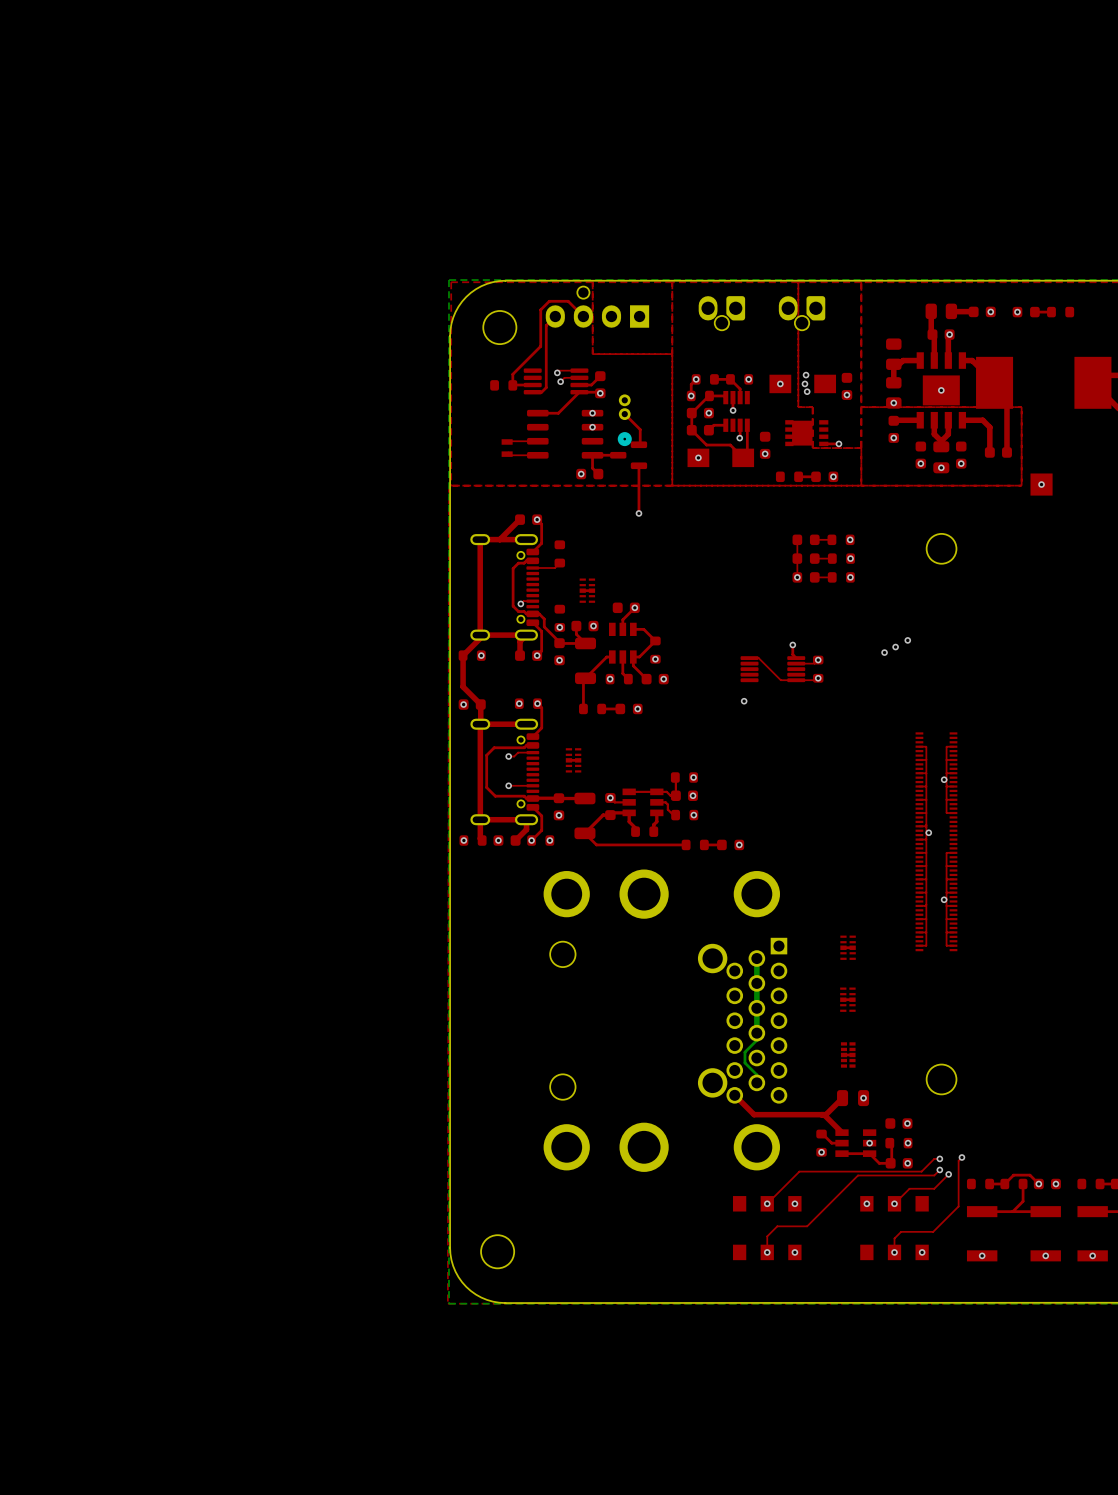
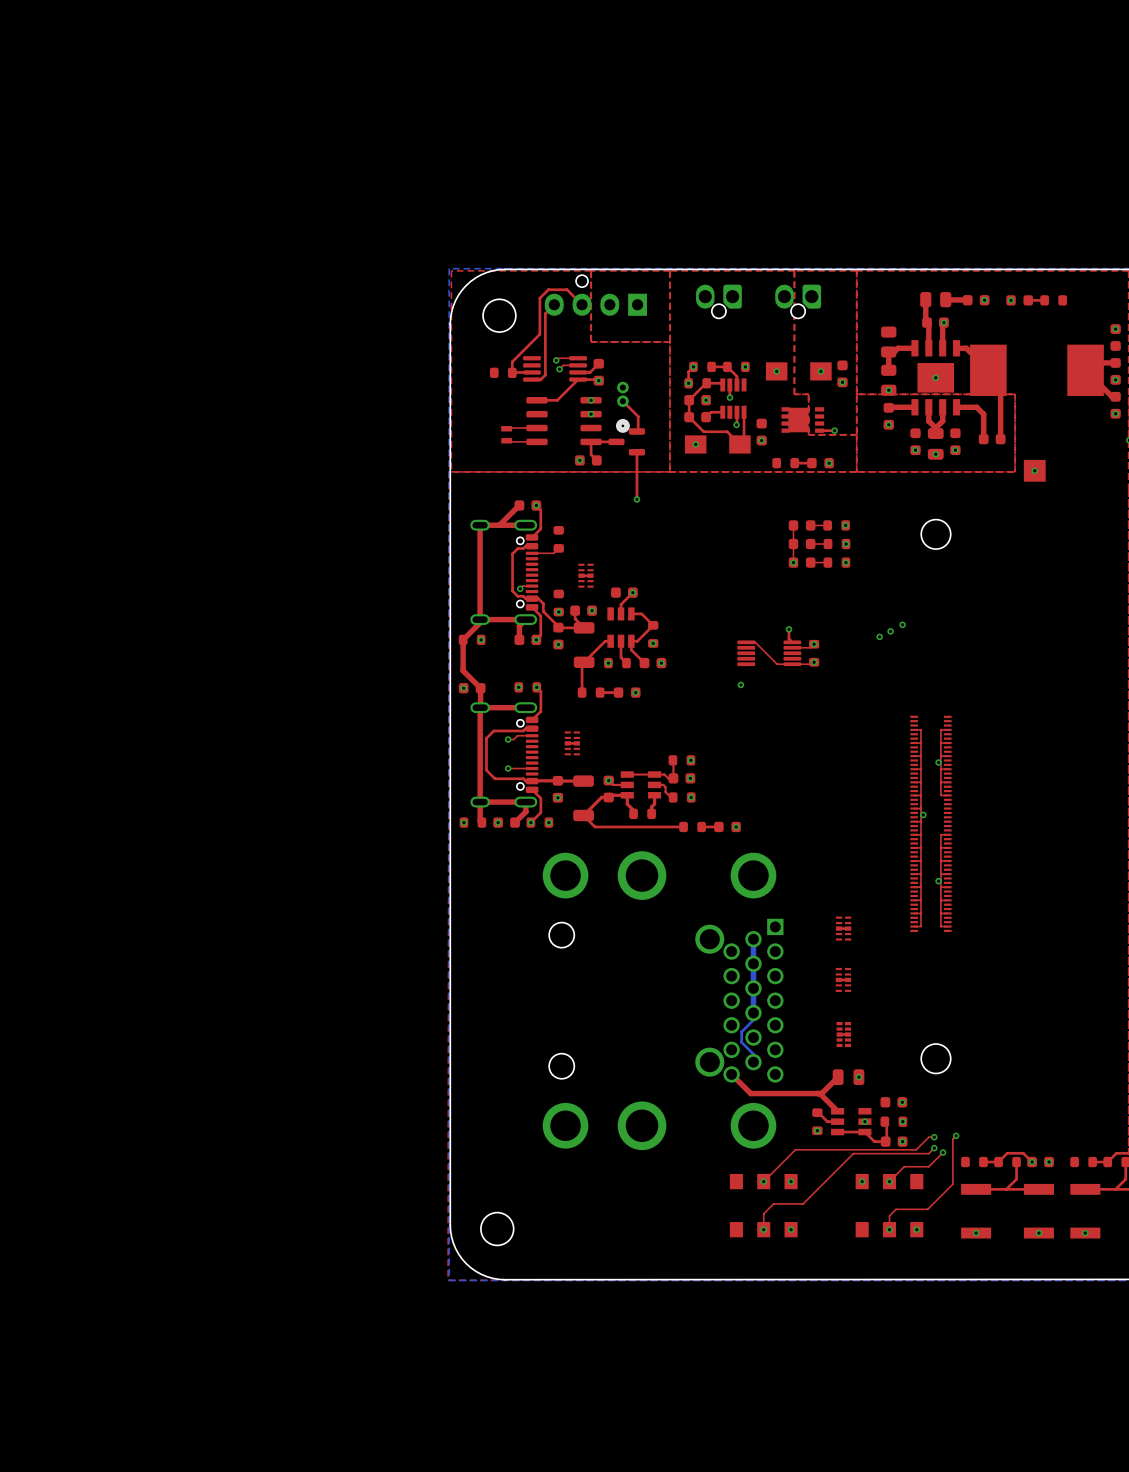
via: (806, 375) -> none
via: (804, 383) -> none
via: none -> (820, 371)
via: (807, 391) -> none

